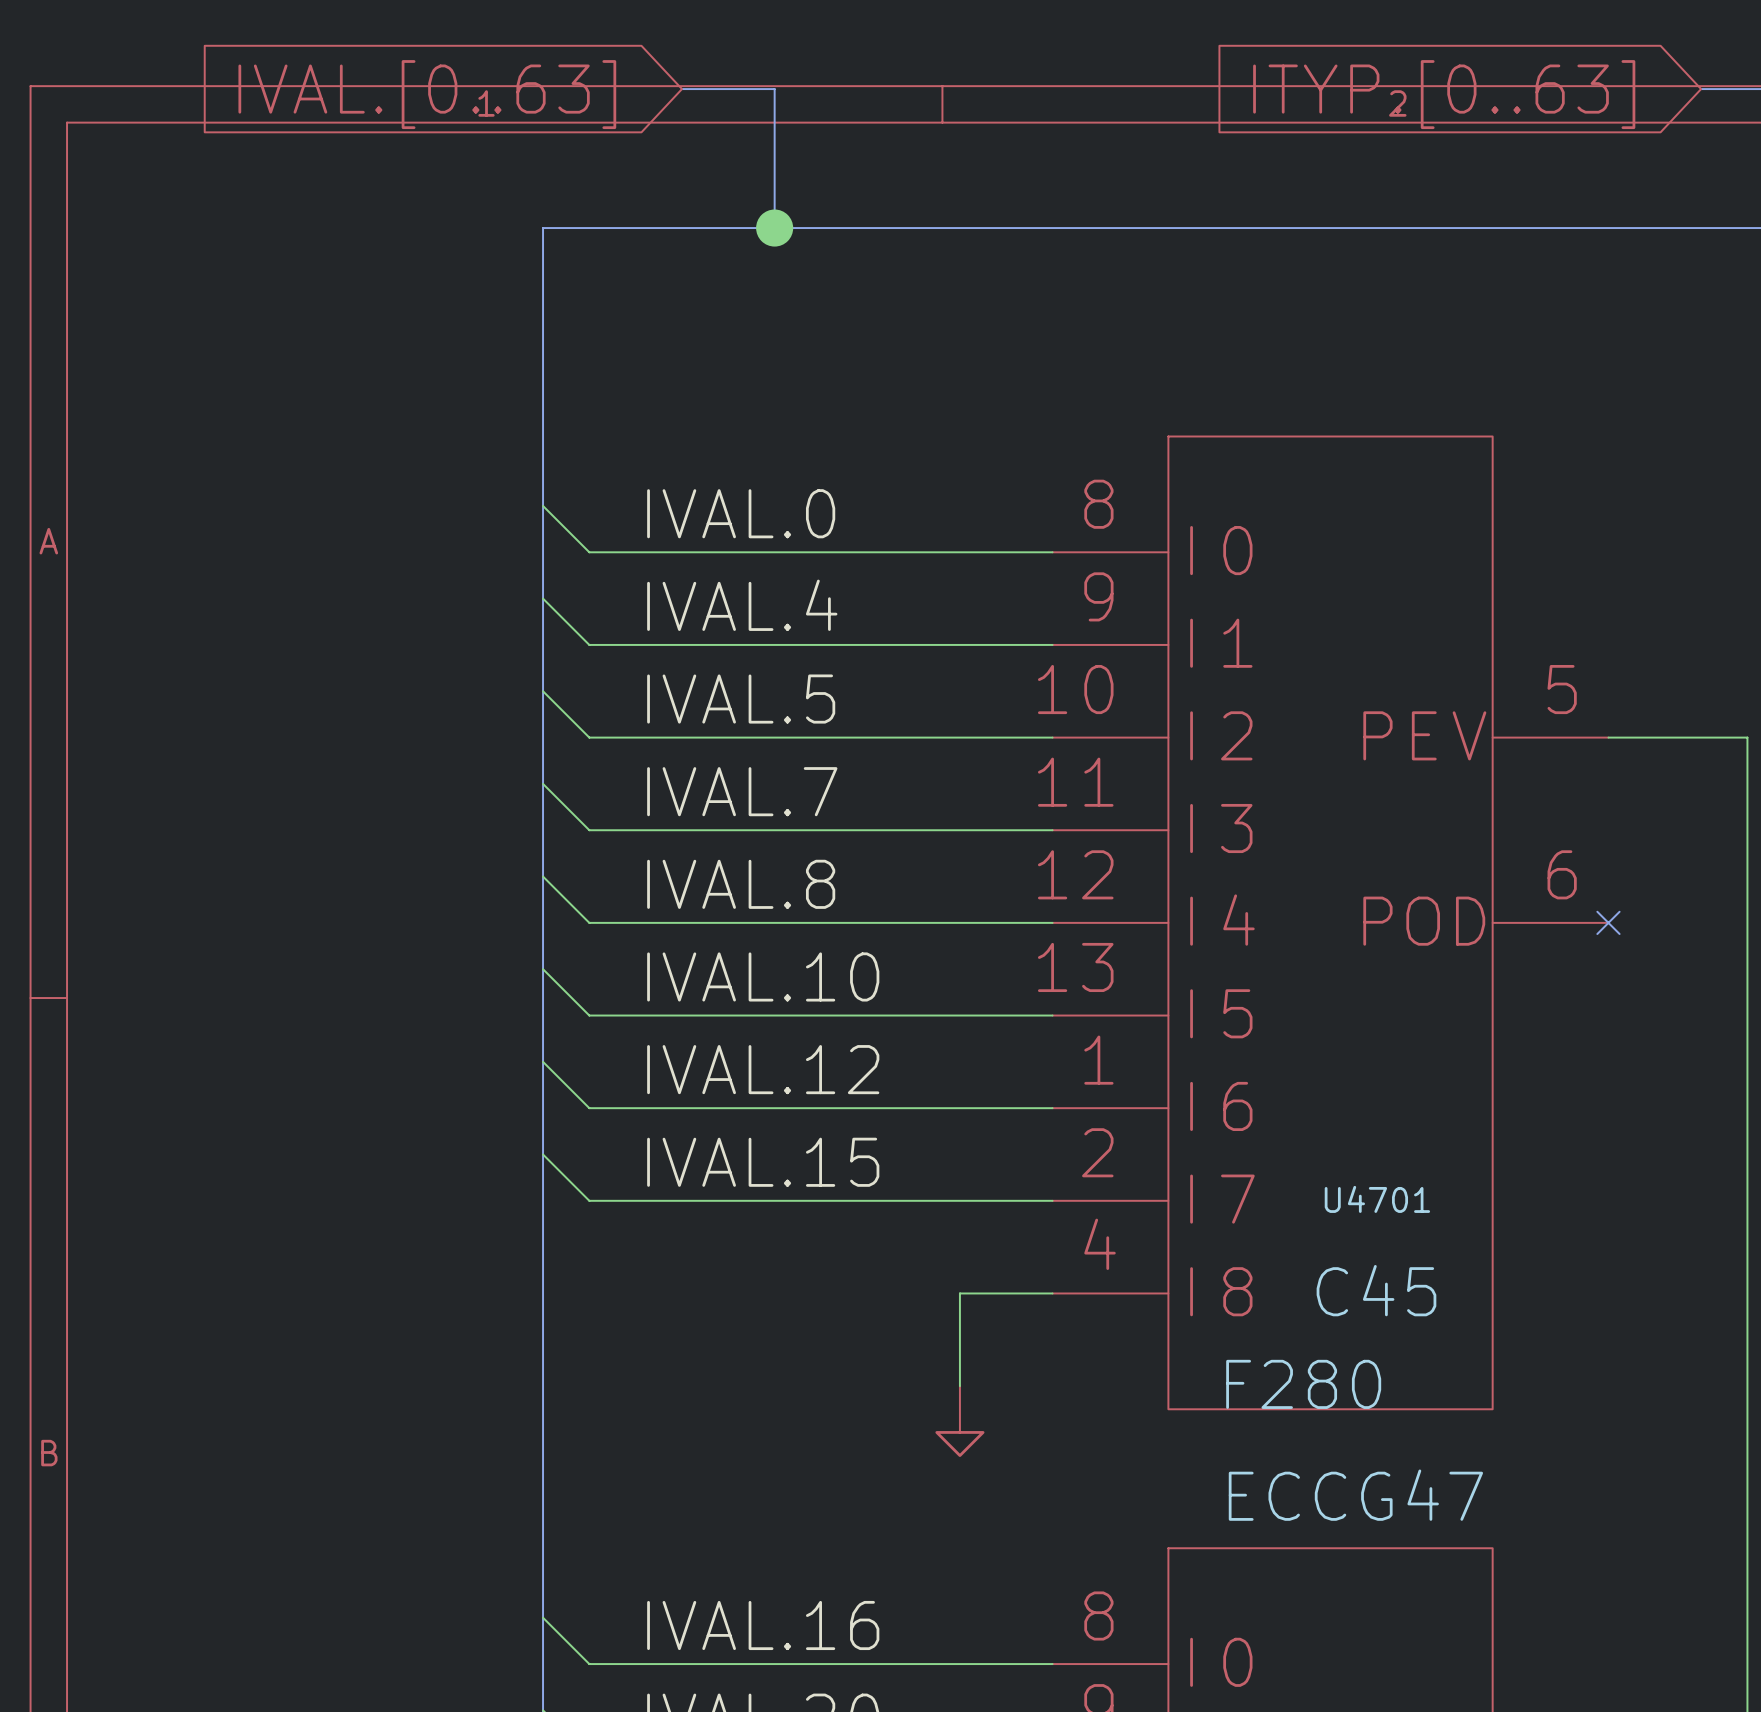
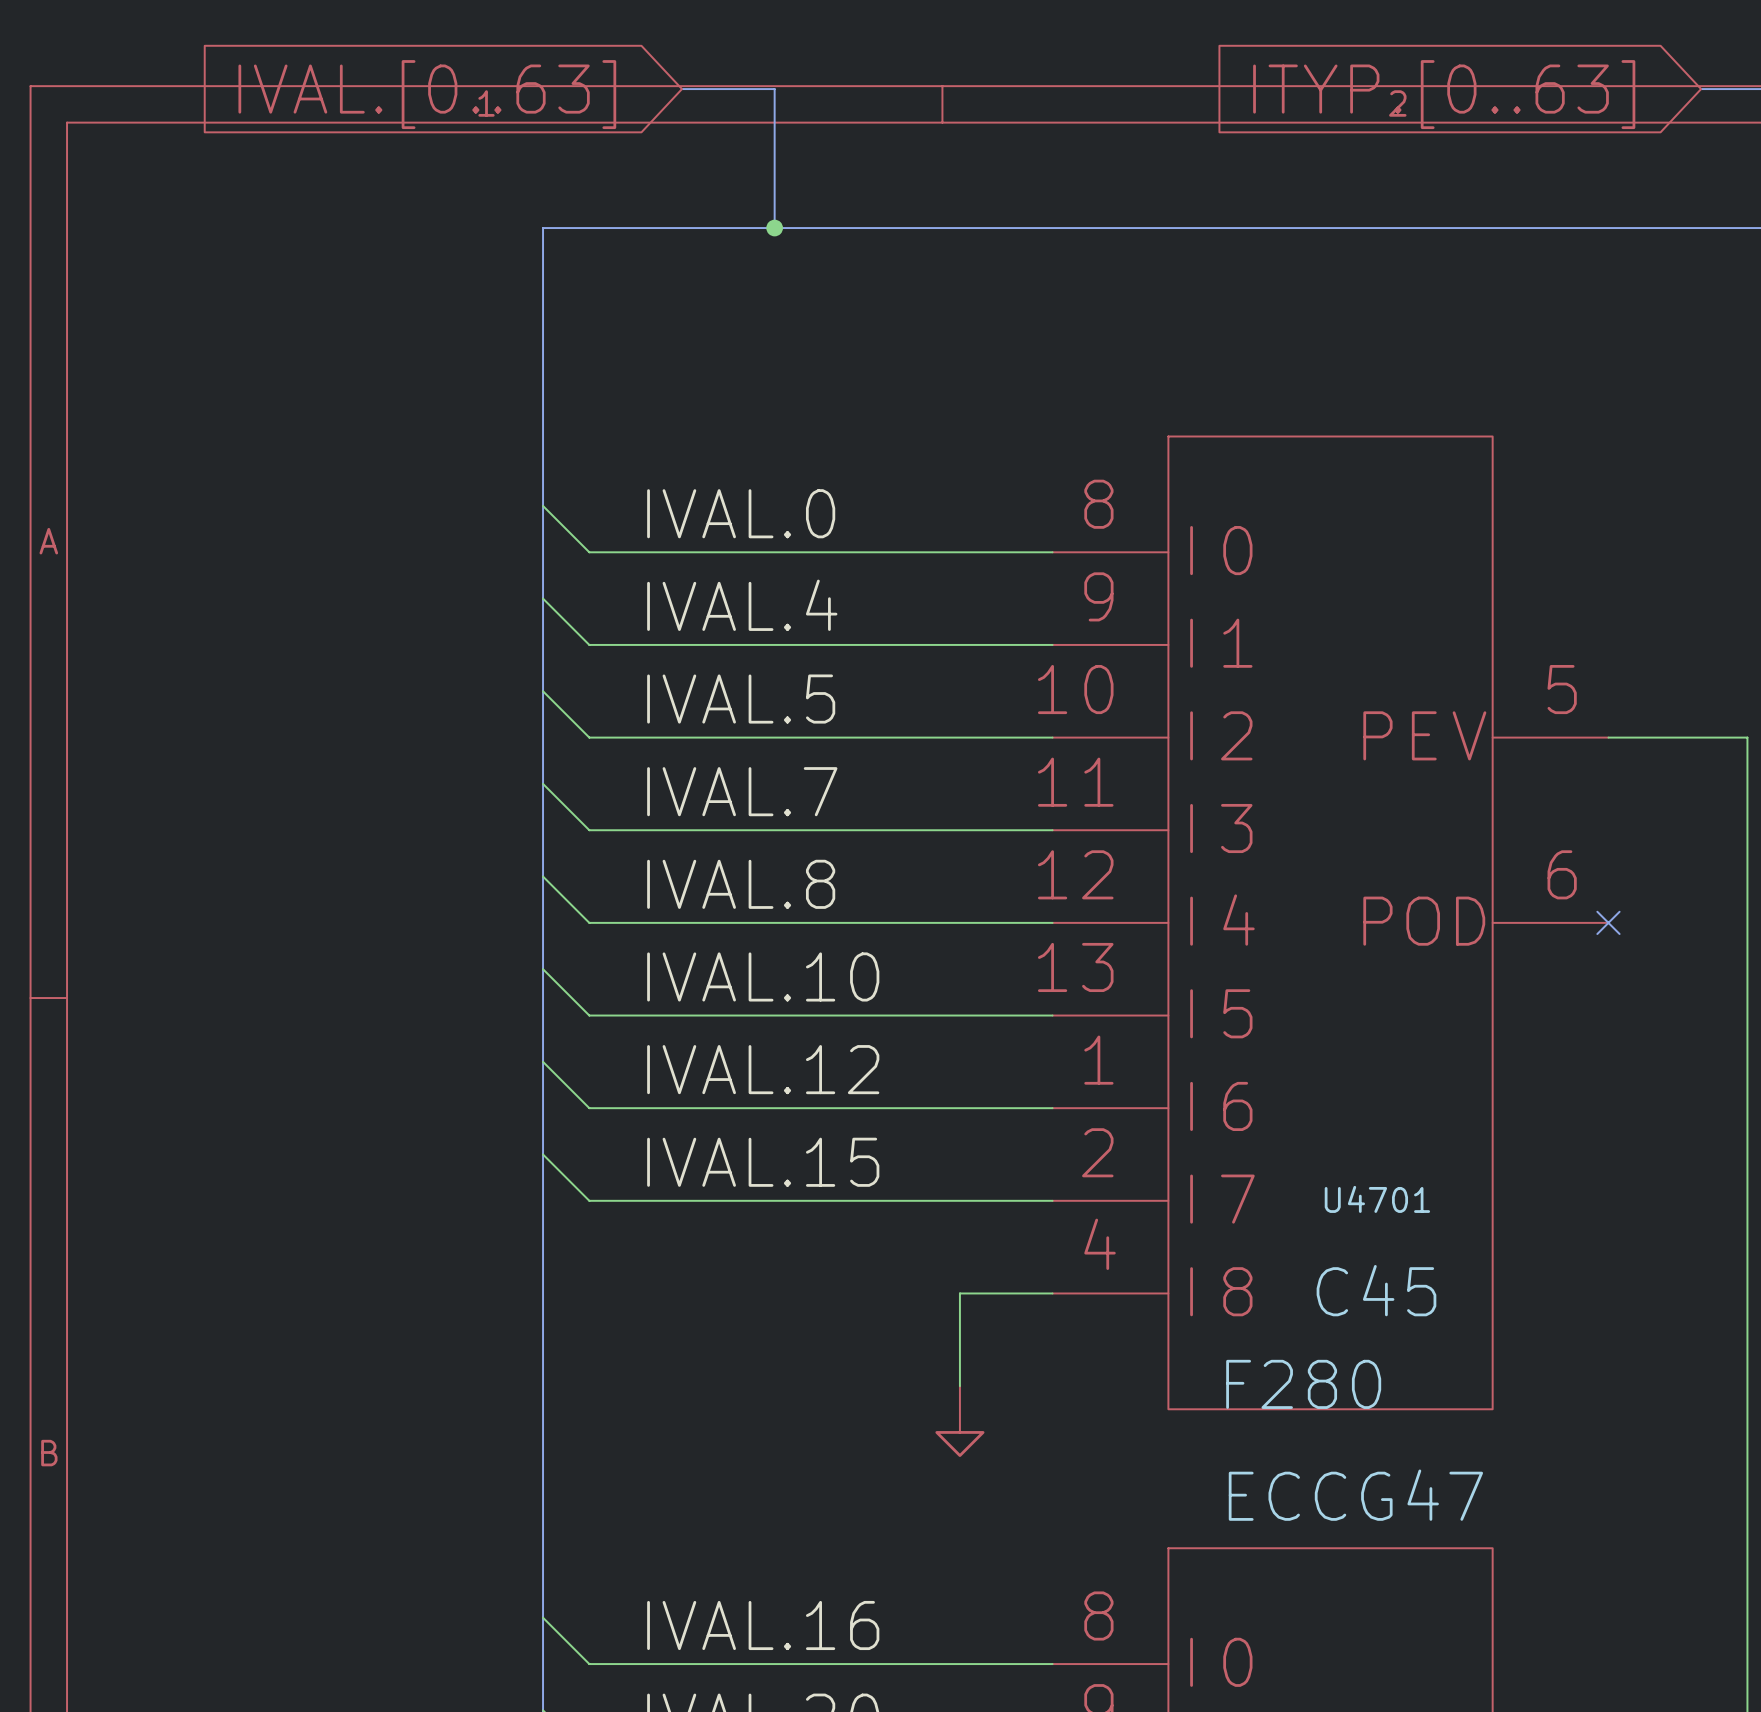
junction size: [756, 209, 794, 247] -> [766, 219, 783, 237]

